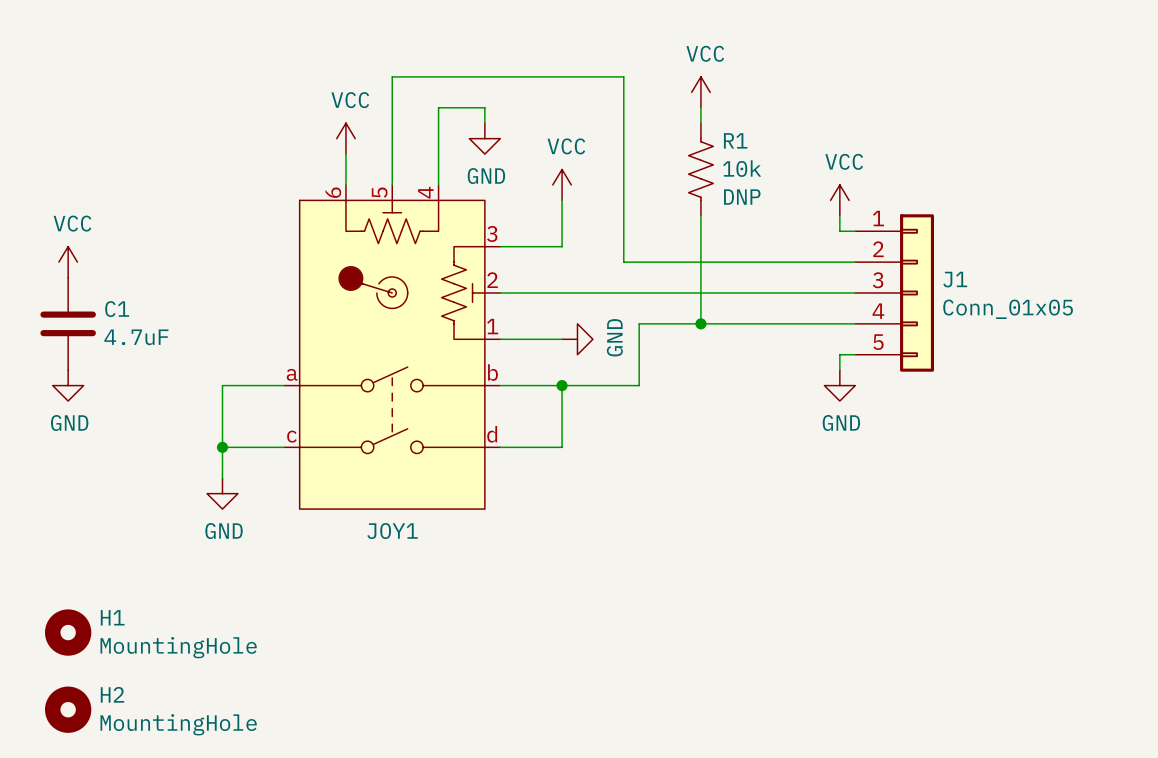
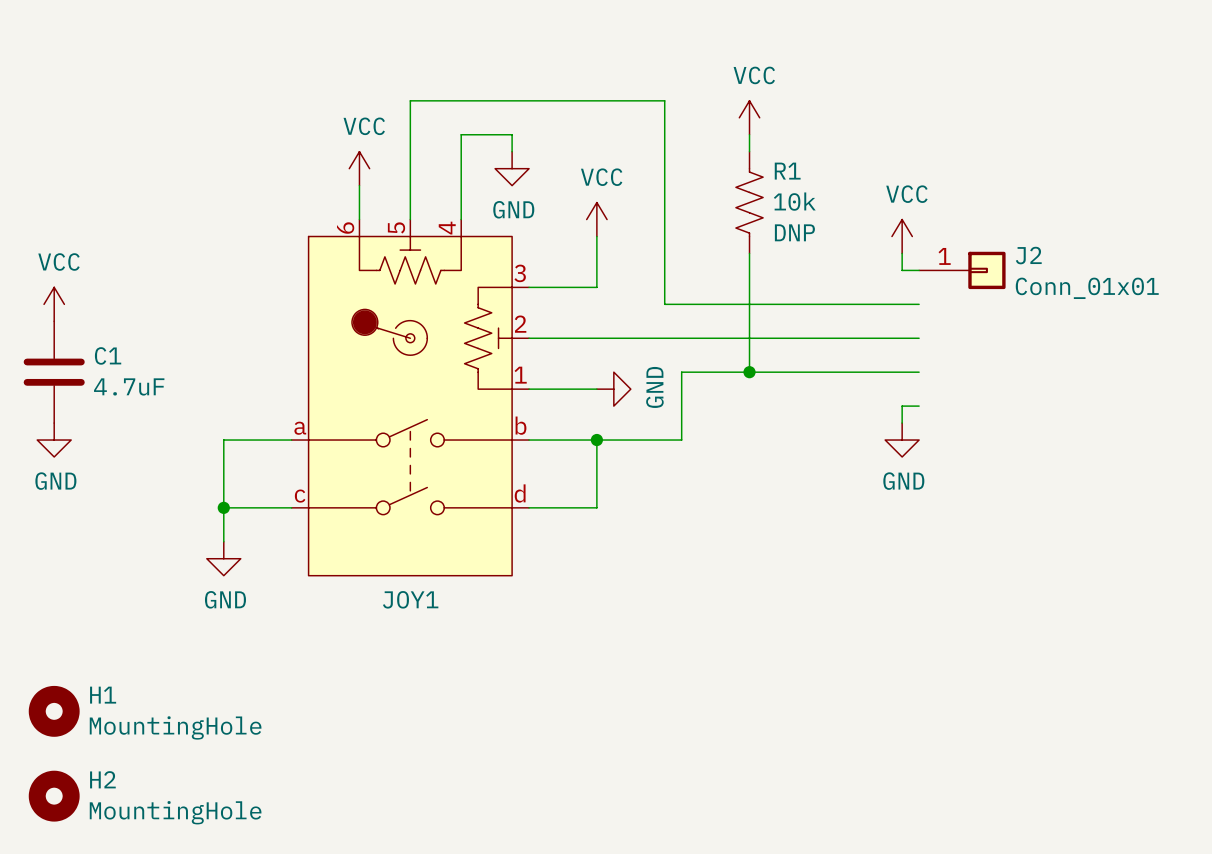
J2: none -> Conn_01x01 (962, 270)
J1: Conn_01x05 (894, 292) -> none

